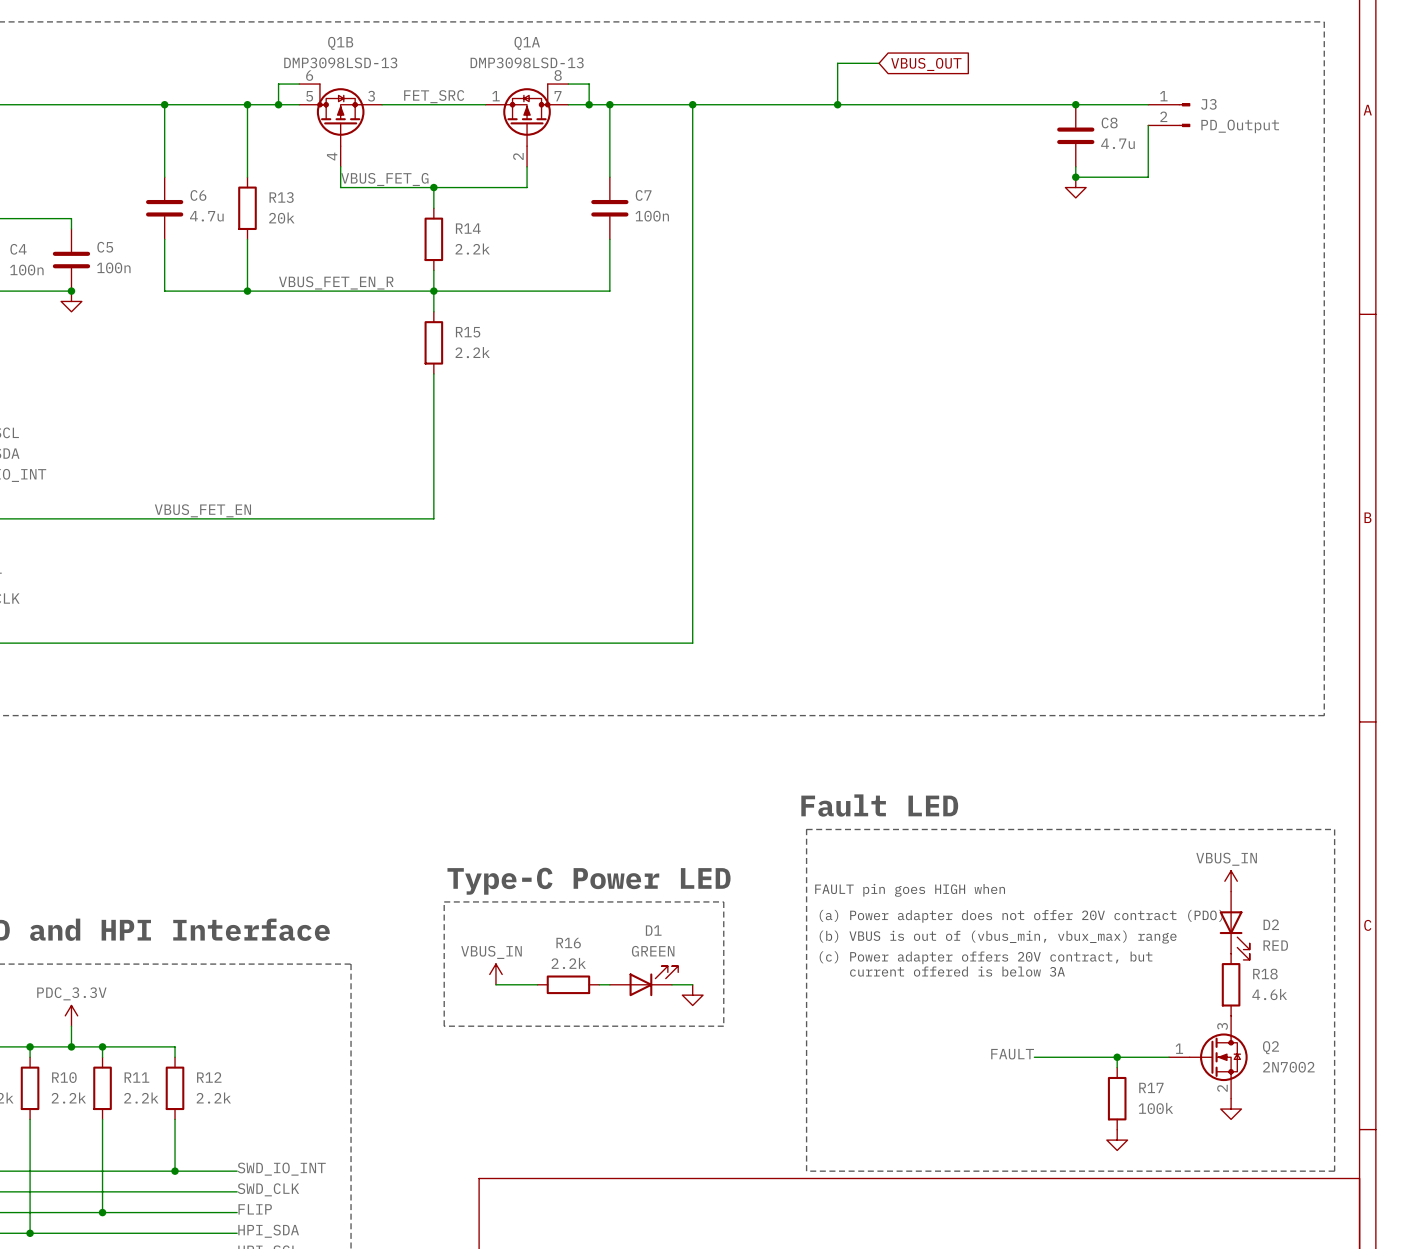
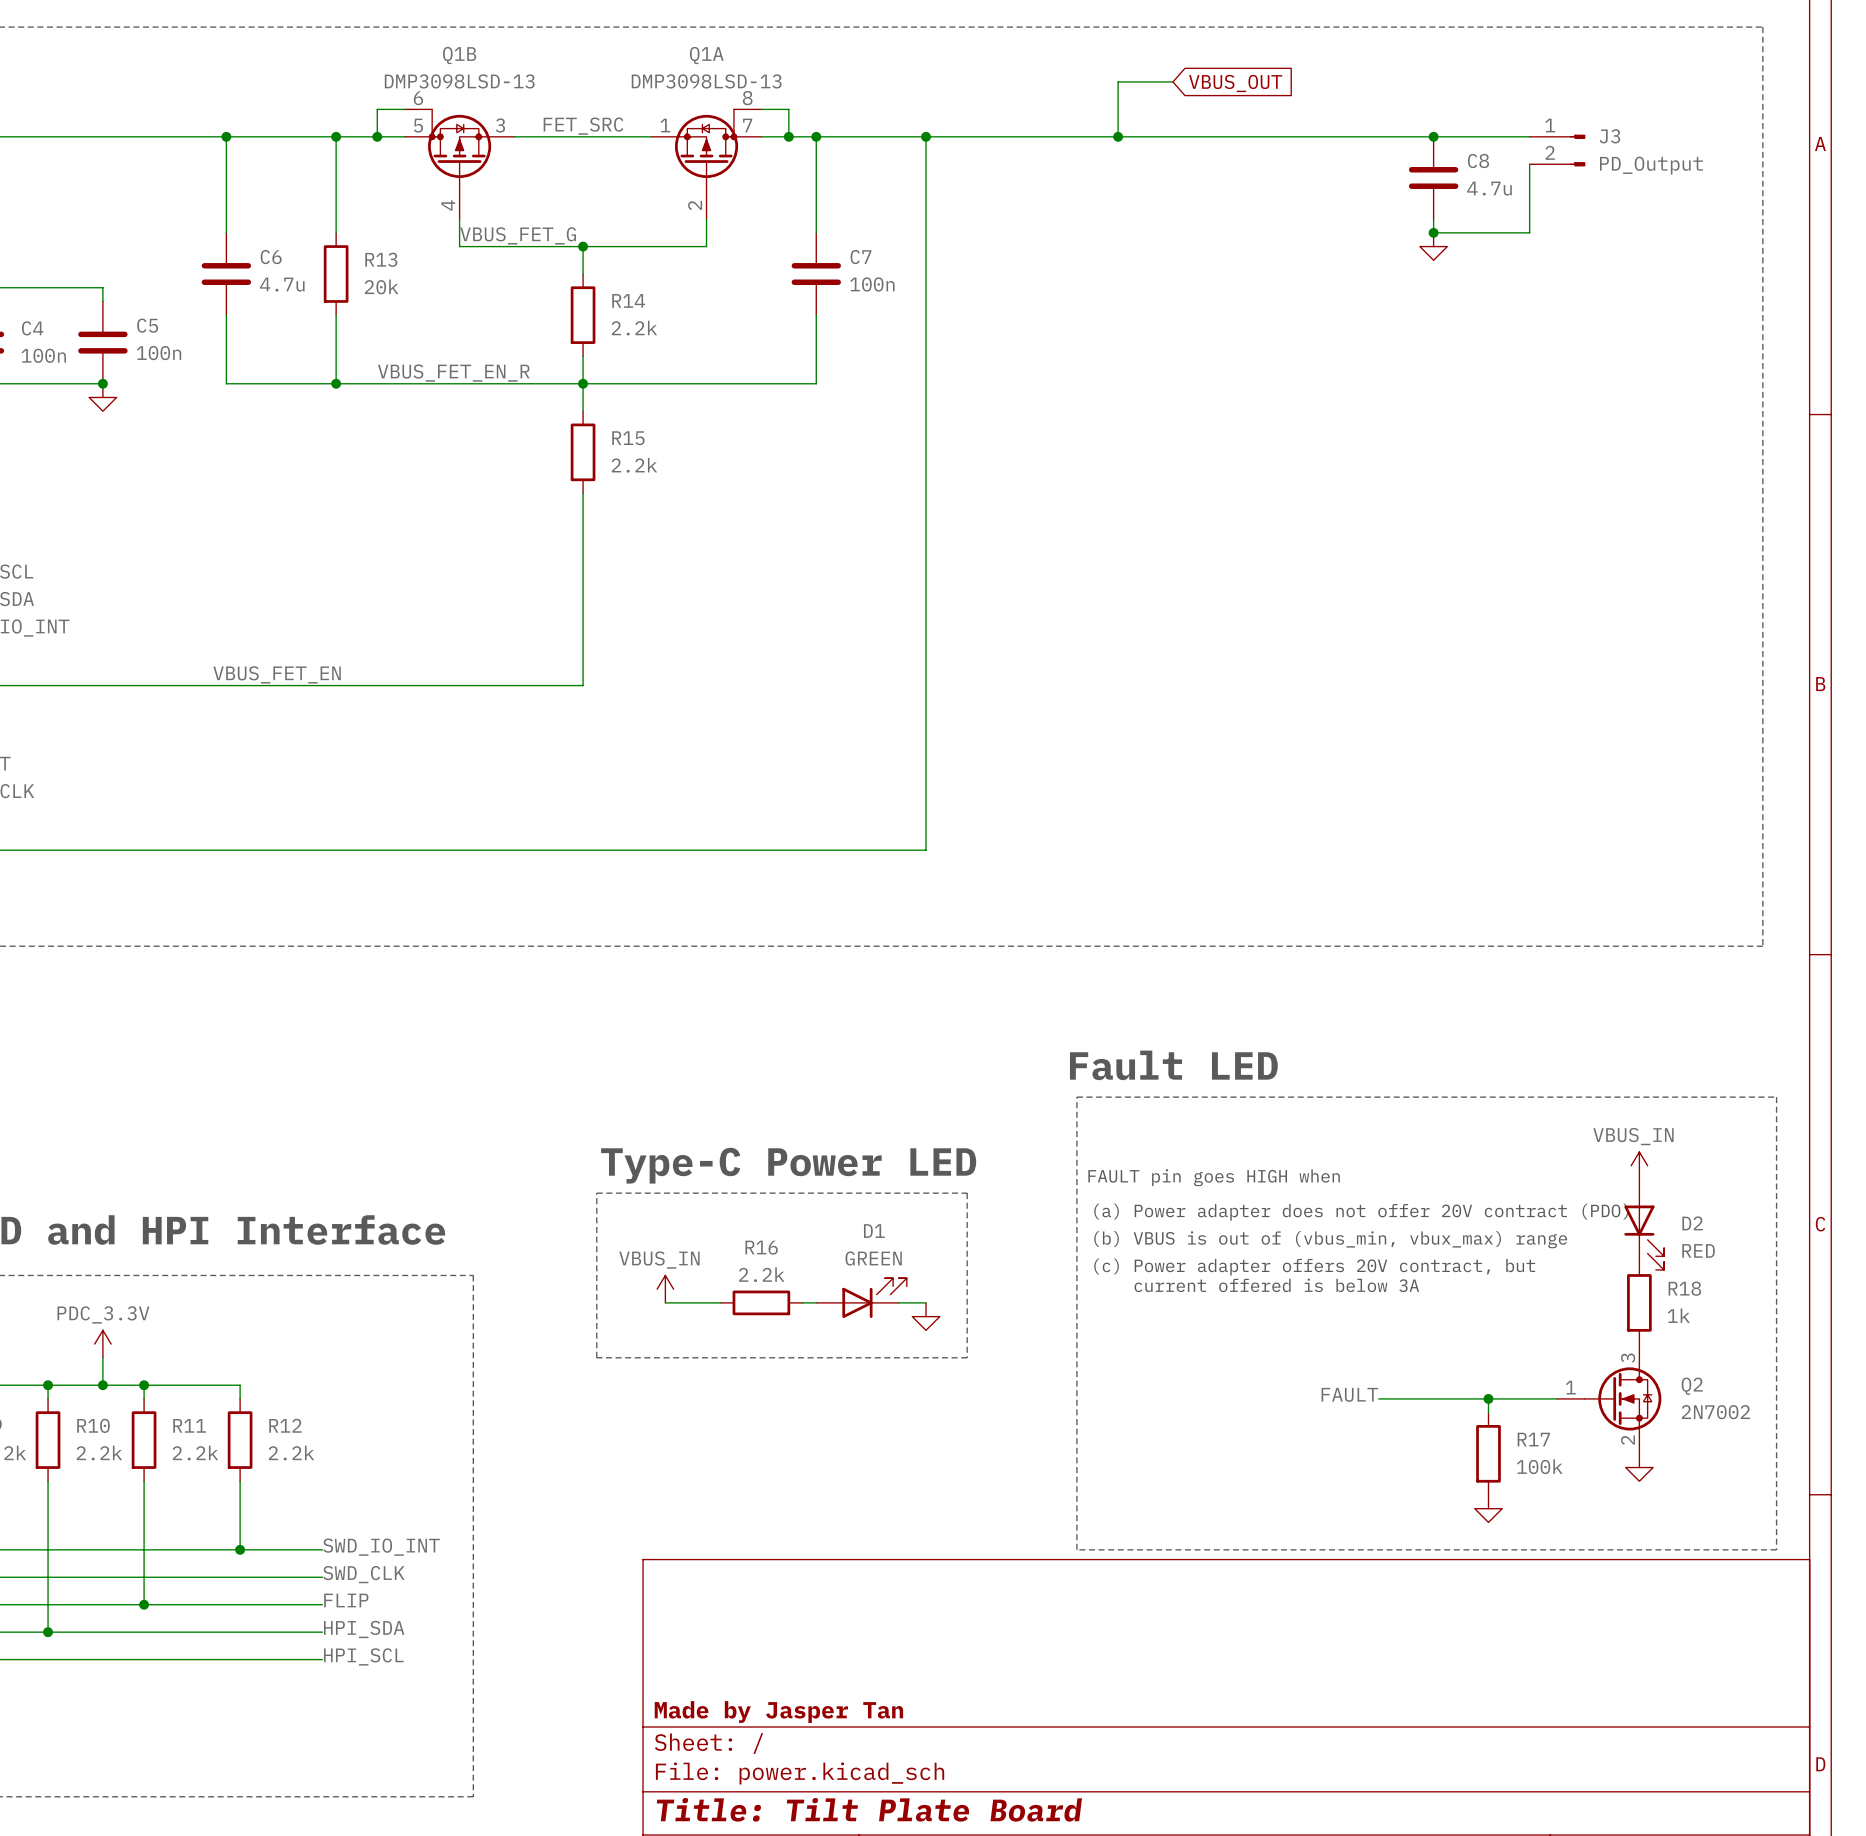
R18 value: 4.6k (1269, 994) -> 1k (1678, 1315)

